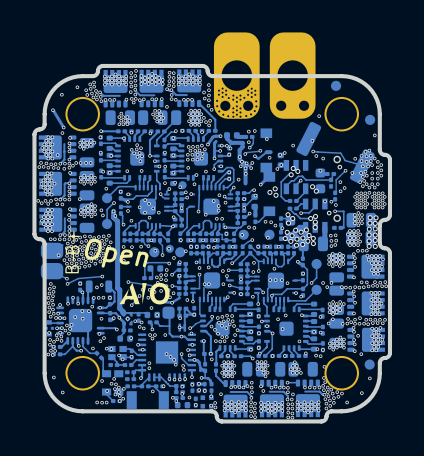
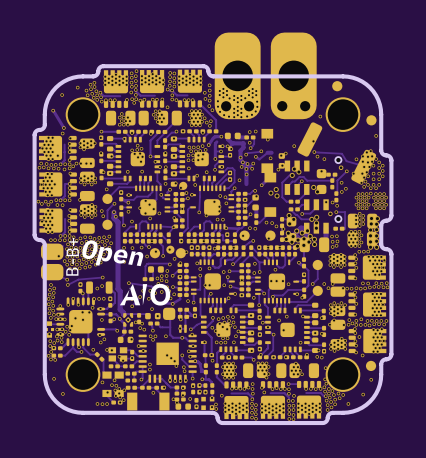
via: (55, 350) -> none
via: (52, 355) -> none
via: none -> (50, 359)
via: none -> (55, 359)

